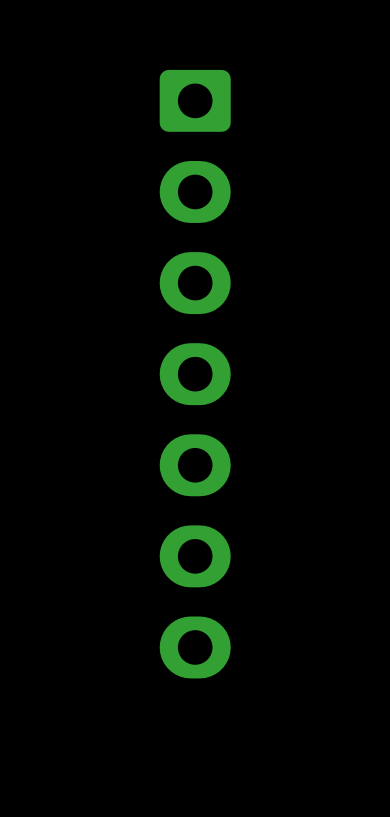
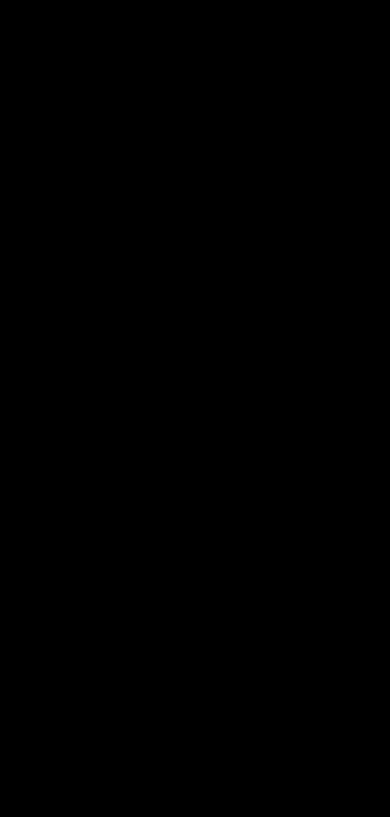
part: (195, 374) -> none

